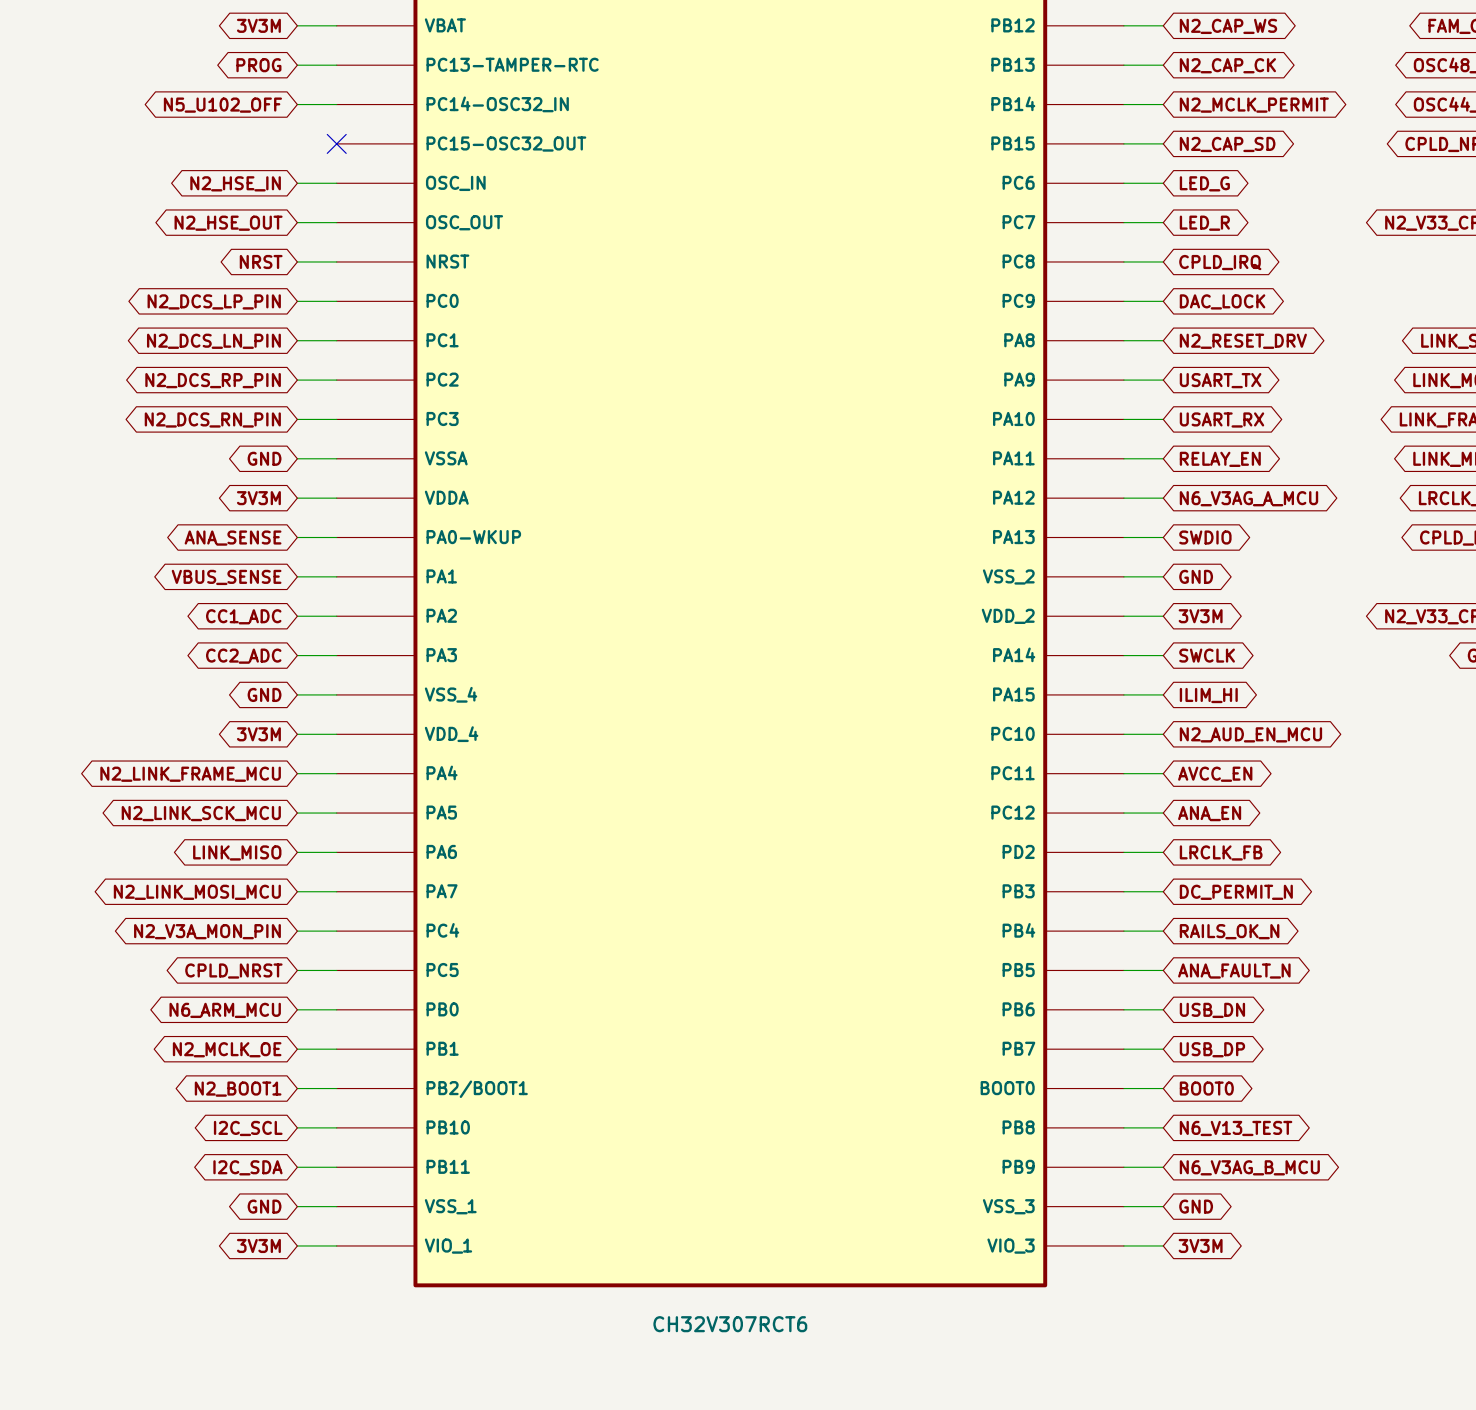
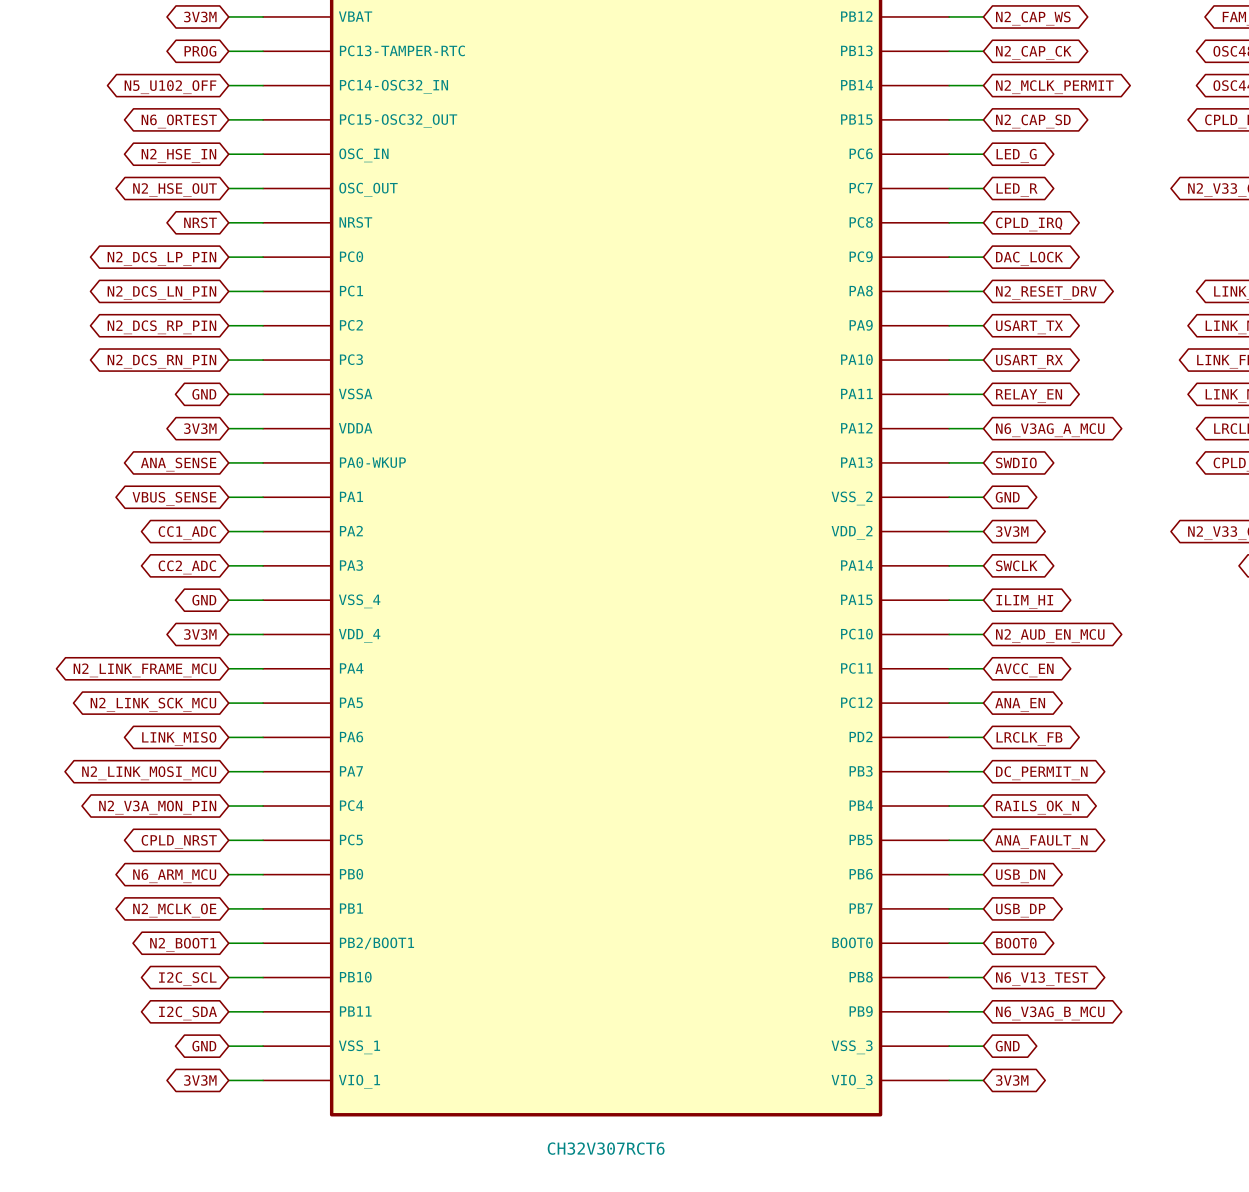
wire: none -> (228, 119) (263, 119)
no-connect mark: (336, 143) -> none
global label: none -> N6_ORTEST (179, 121)

